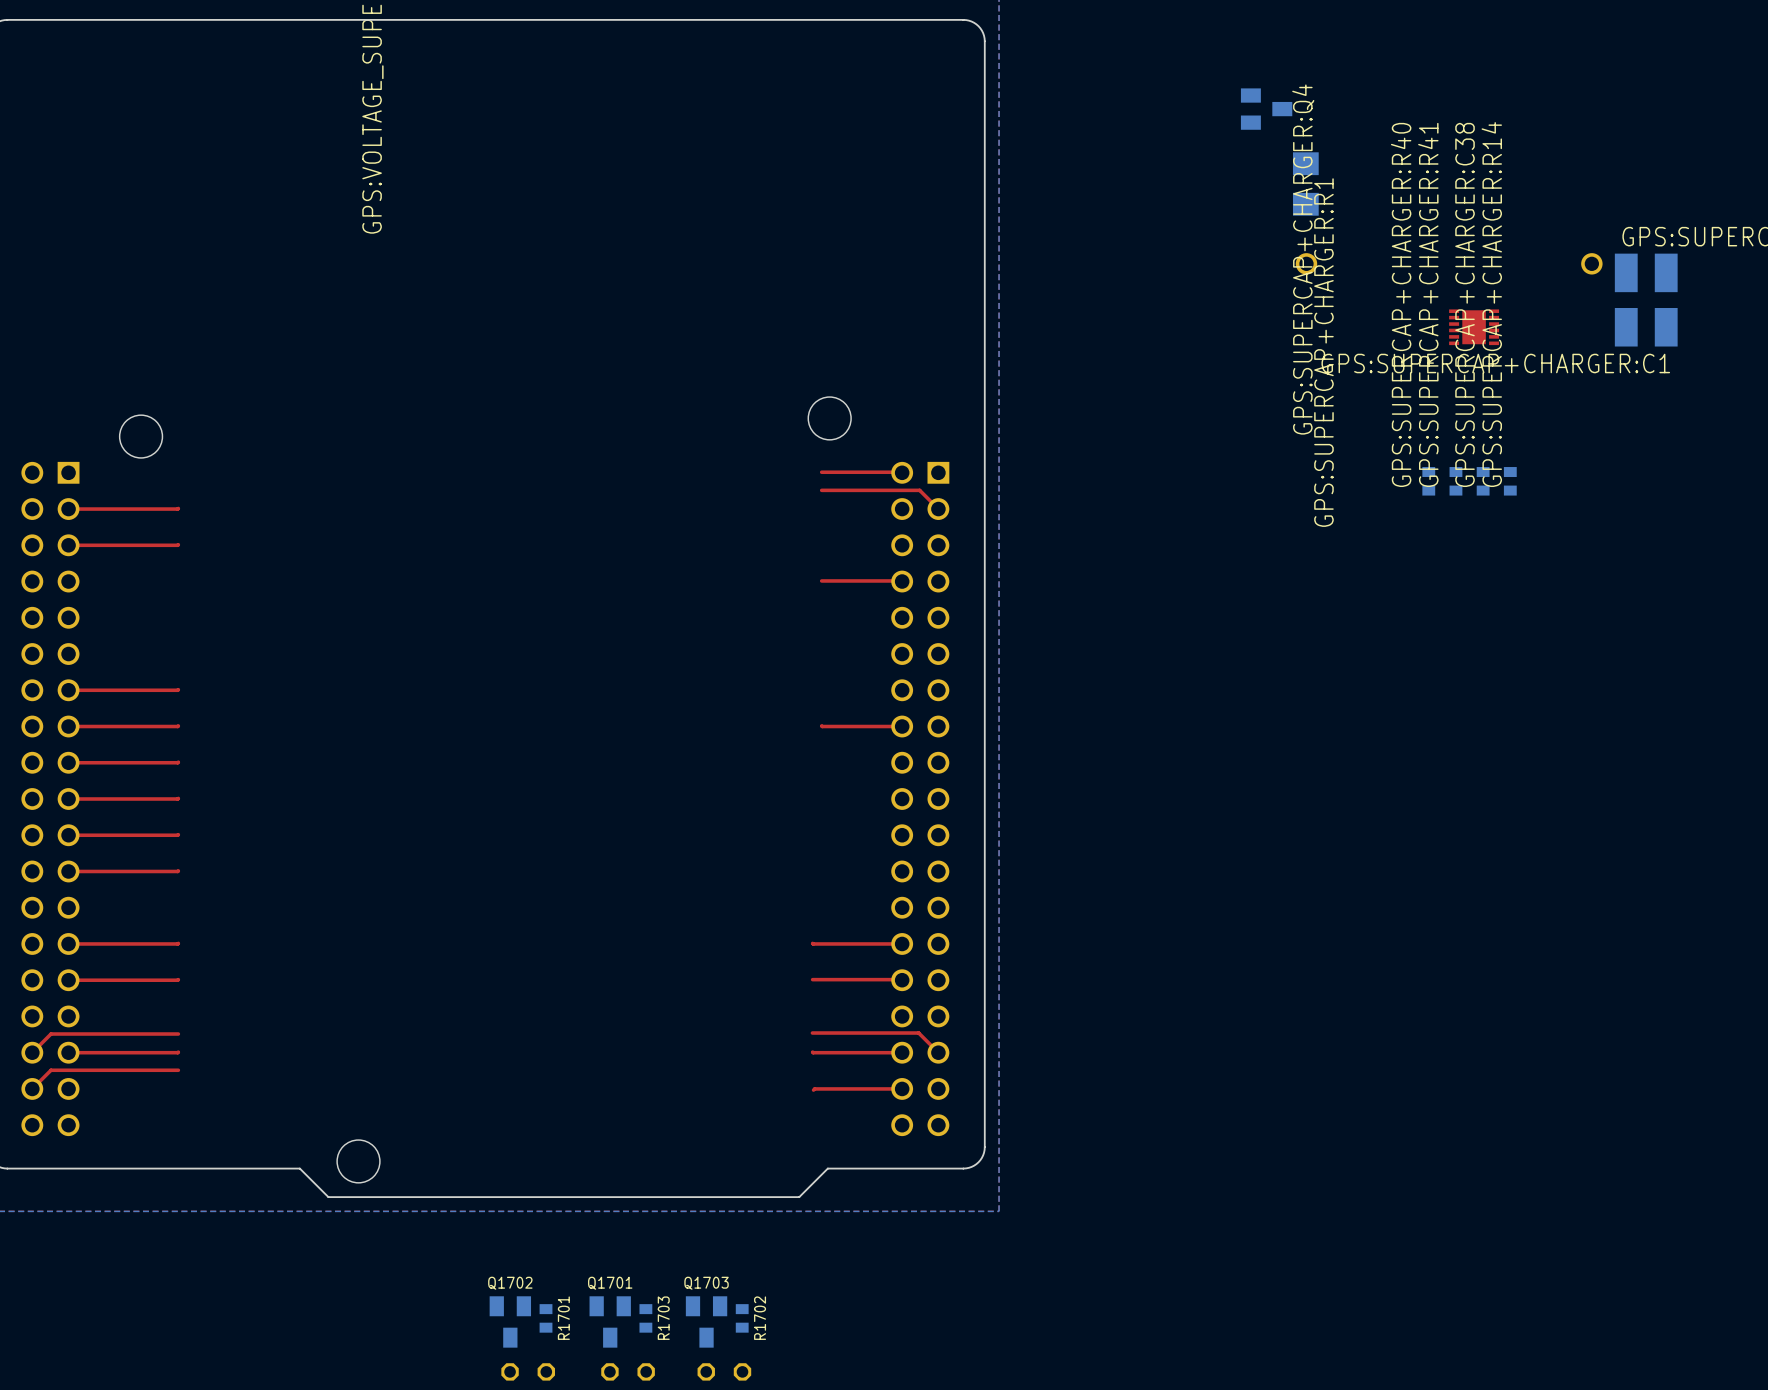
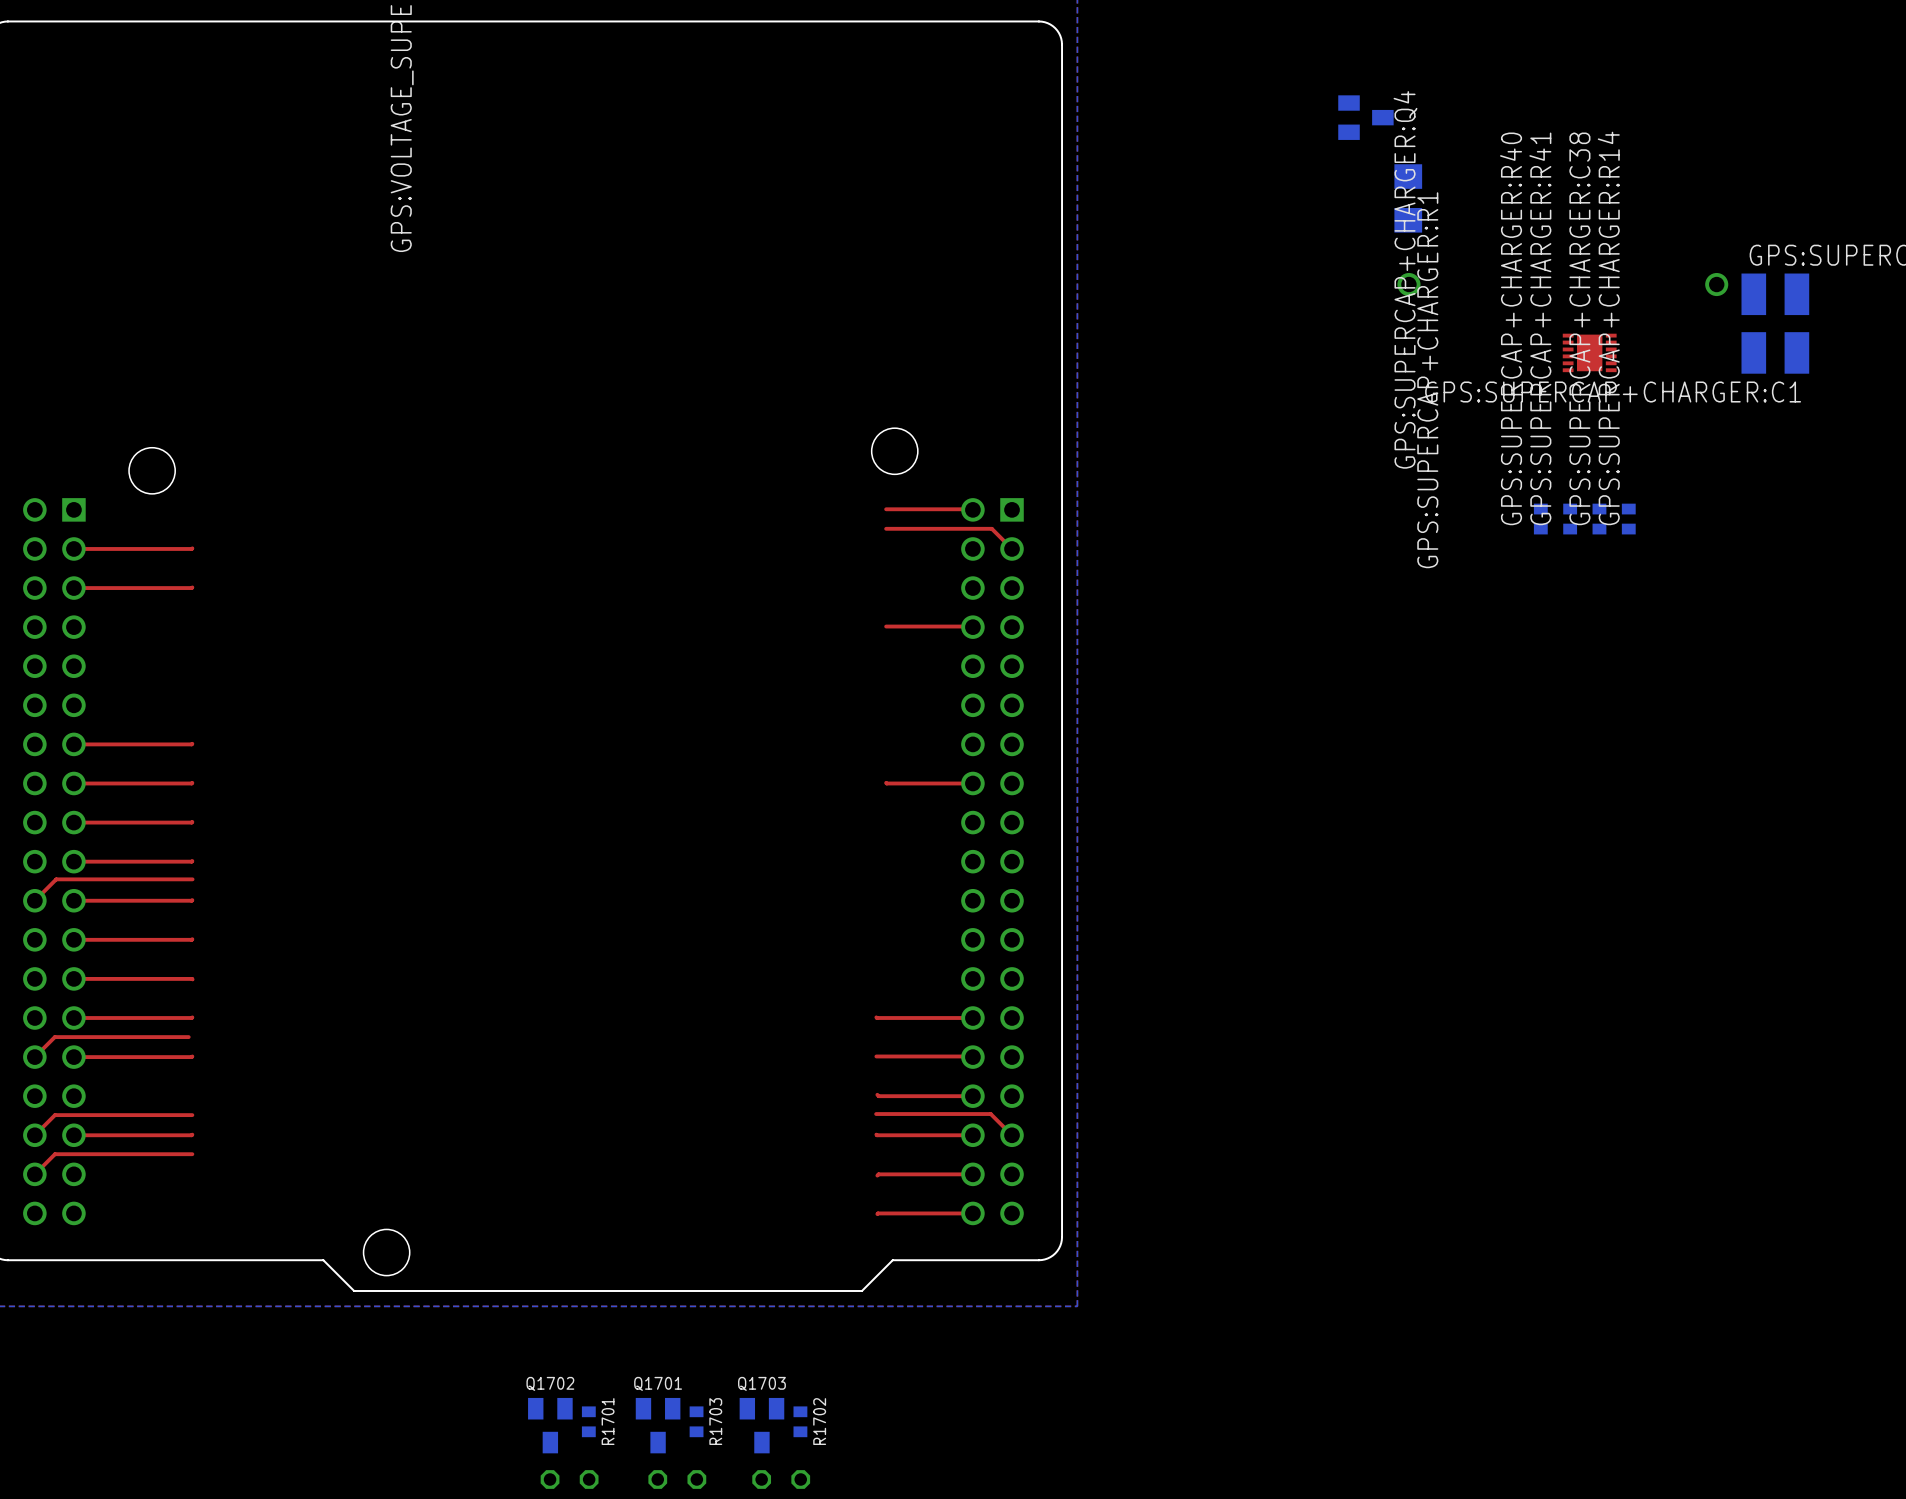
top track: none -> (192, 879) (56, 879) (34, 900)
top track: none -> (73, 978) (192, 979)
top track: none -> (188, 1037) (54, 1037) (34, 1057)
top track: none -> (877, 1094) (972, 1096)
top track: none -> (972, 1213) (877, 1214)

